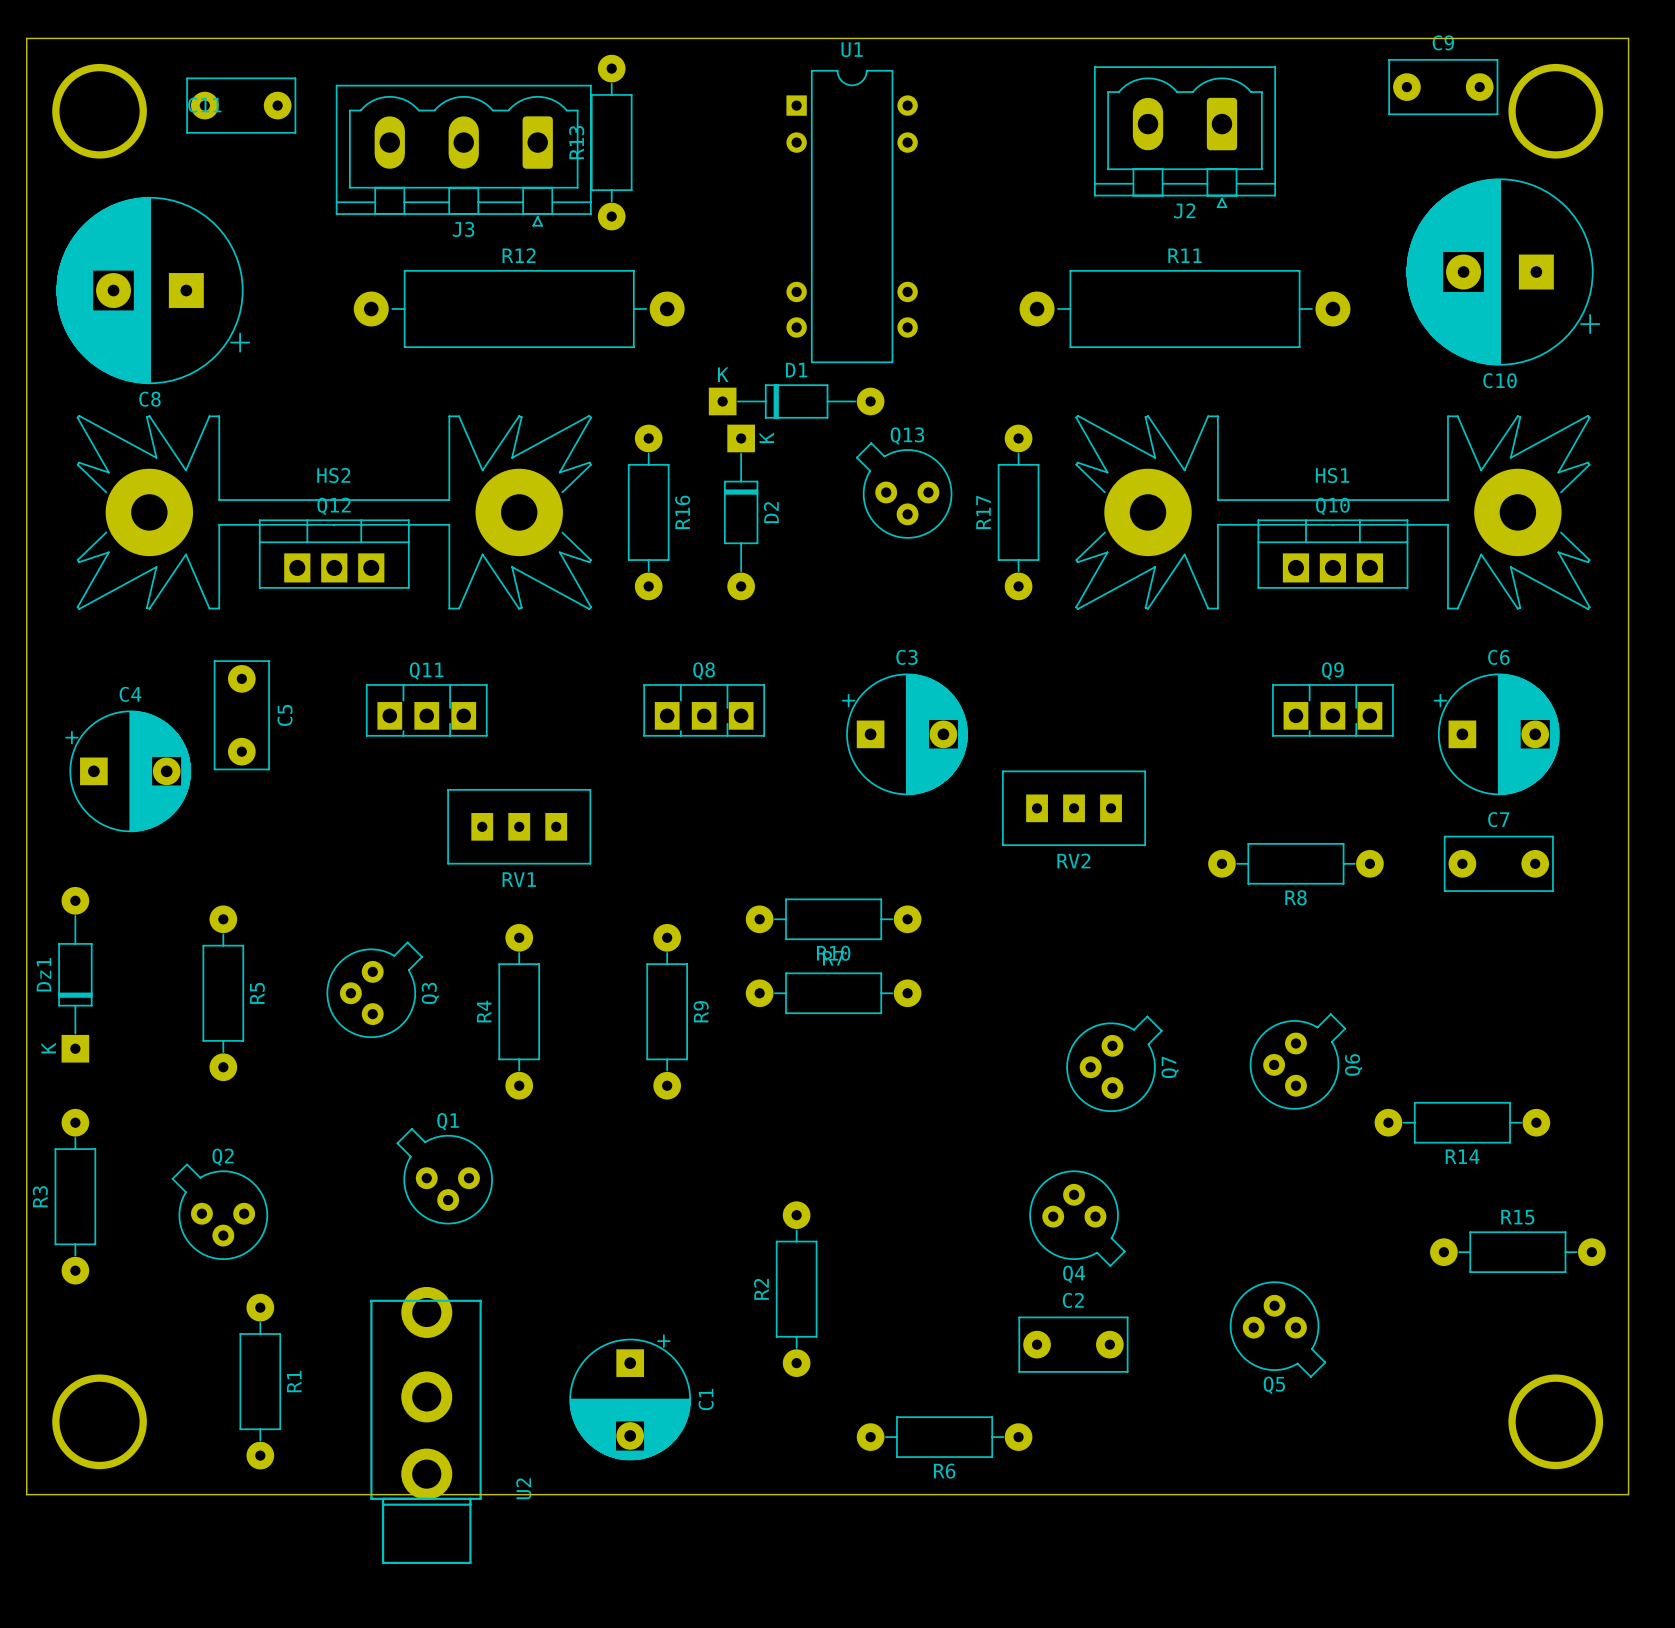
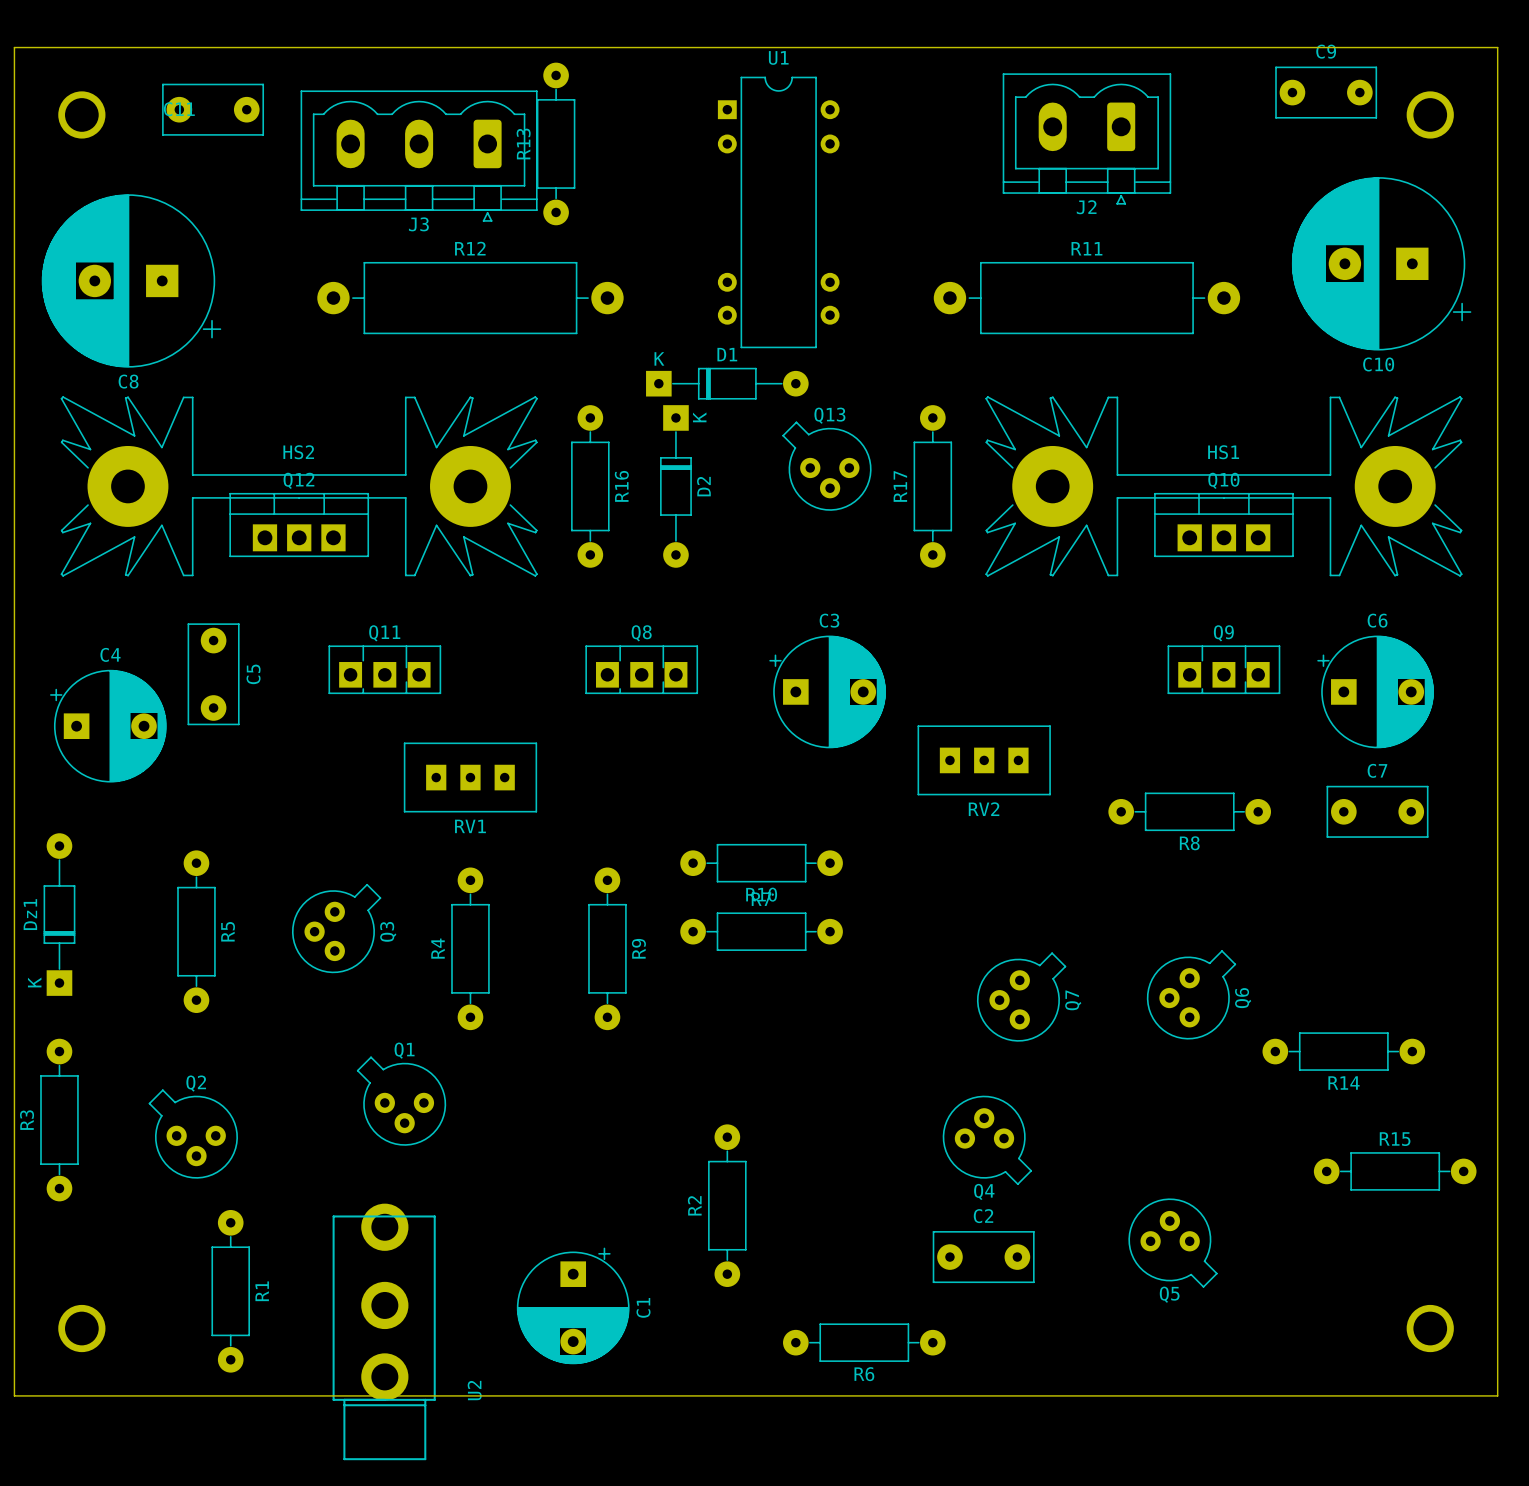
round board edge size: [52, 63, 147, 159] -> [58, 91, 106, 139]
round board edge size: [1508, 63, 1604, 159] -> [1406, 91, 1454, 139]
round board edge size: [52, 1374, 147, 1470] -> [58, 1304, 106, 1353]
round board edge size: [1508, 1374, 1604, 1470] -> [1406, 1304, 1454, 1353]

